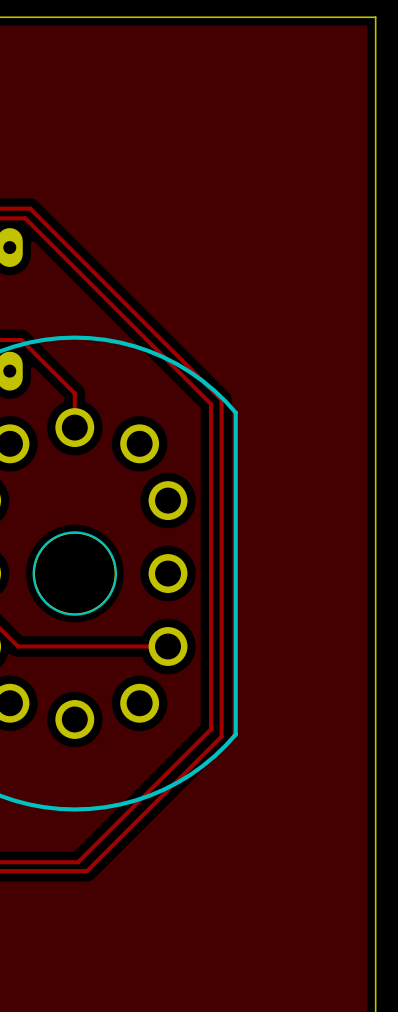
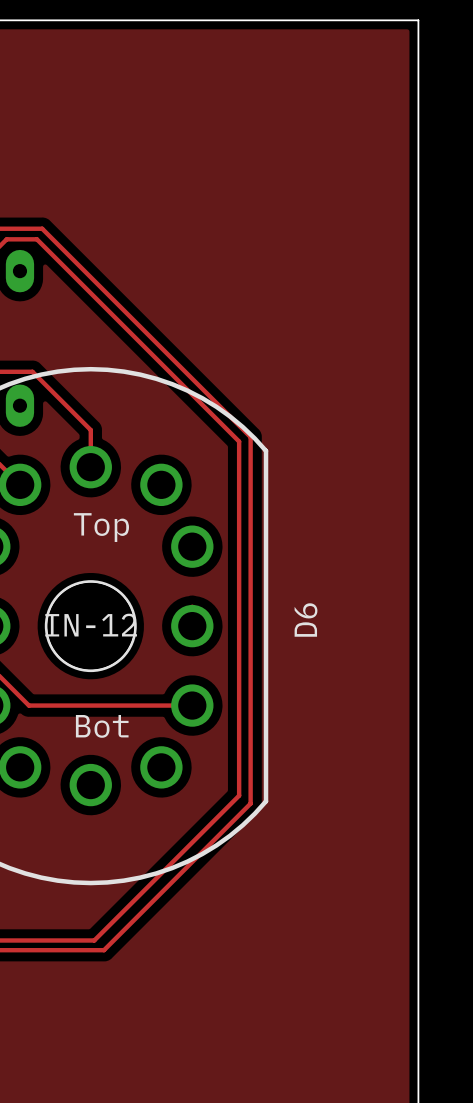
D6 text: none -> Top (101, 527)
D6 name: none -> D6 (306, 620)
D6 value: none -> IN-12 (91, 625)
D6 text: none -> Bot (102, 726)

